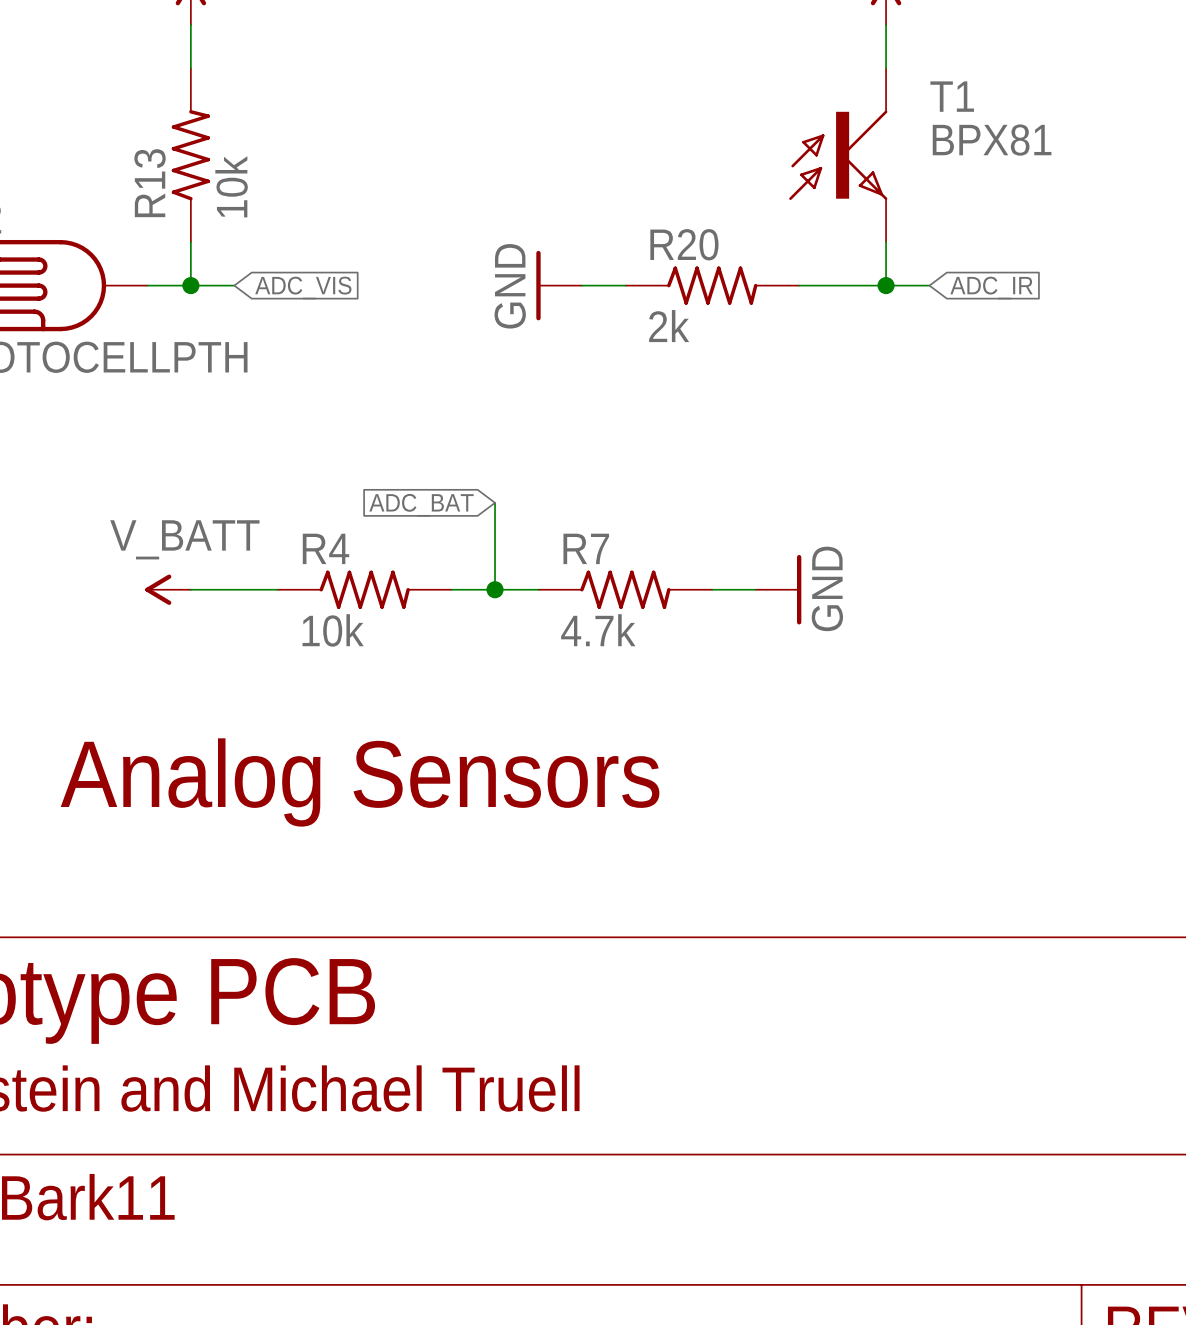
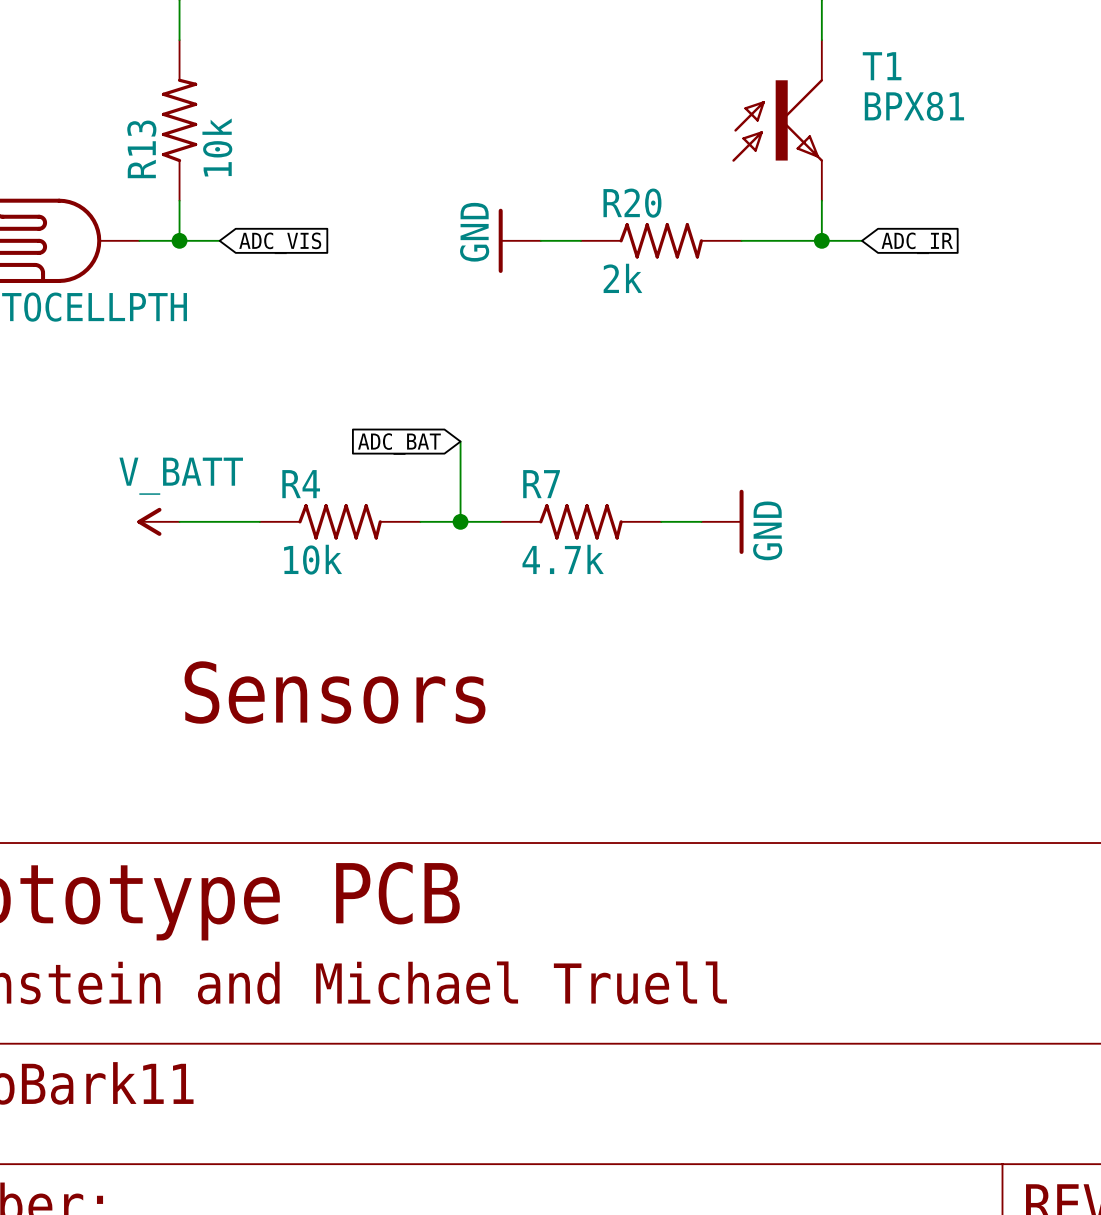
text: Analog Sensors (360, 782) -> Sensors (335, 692)

